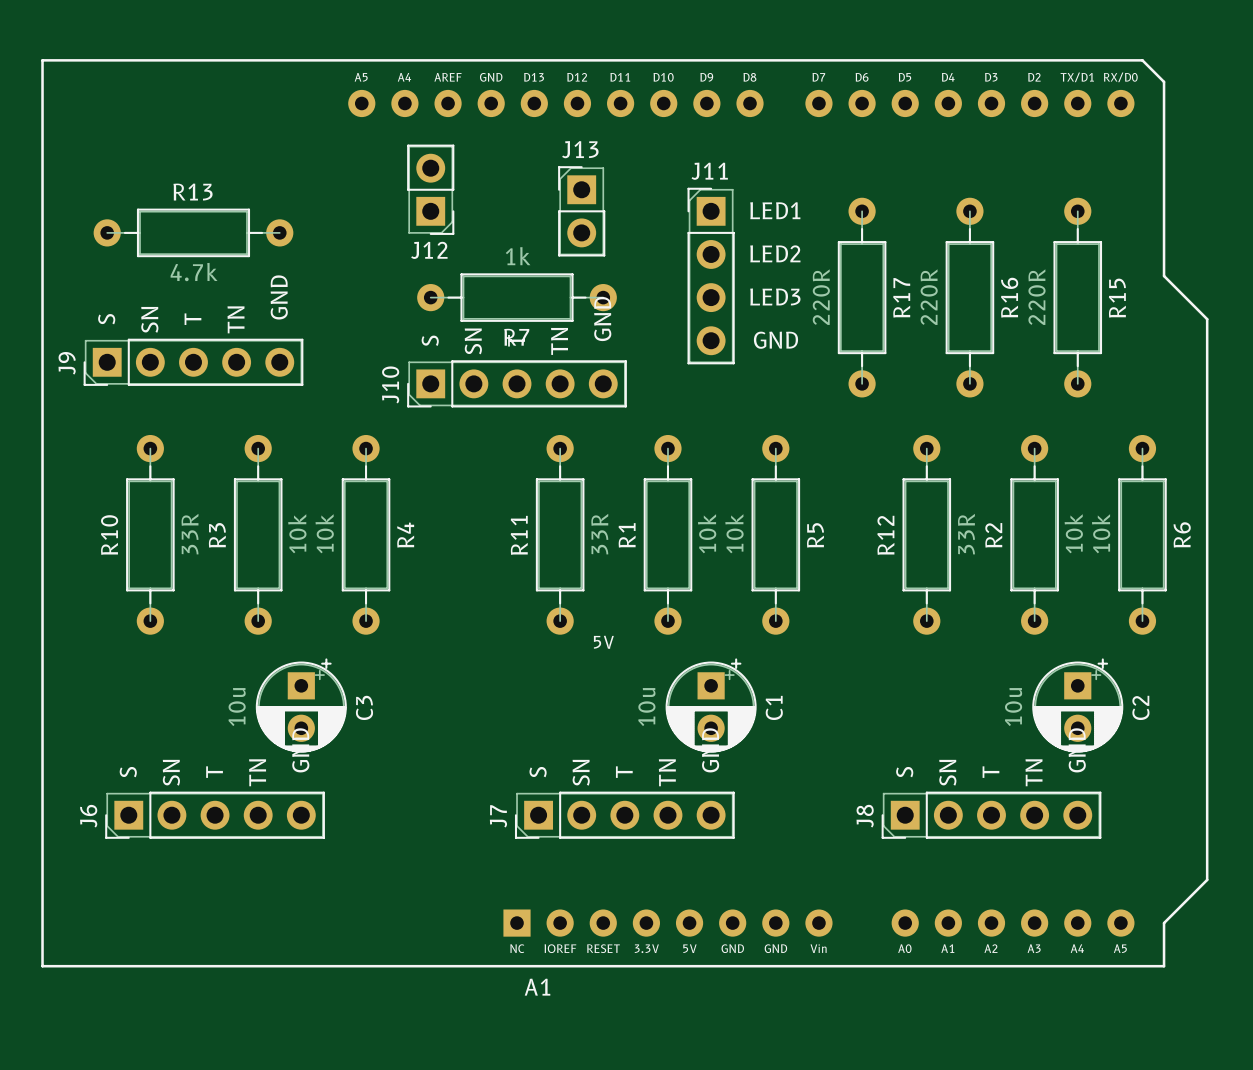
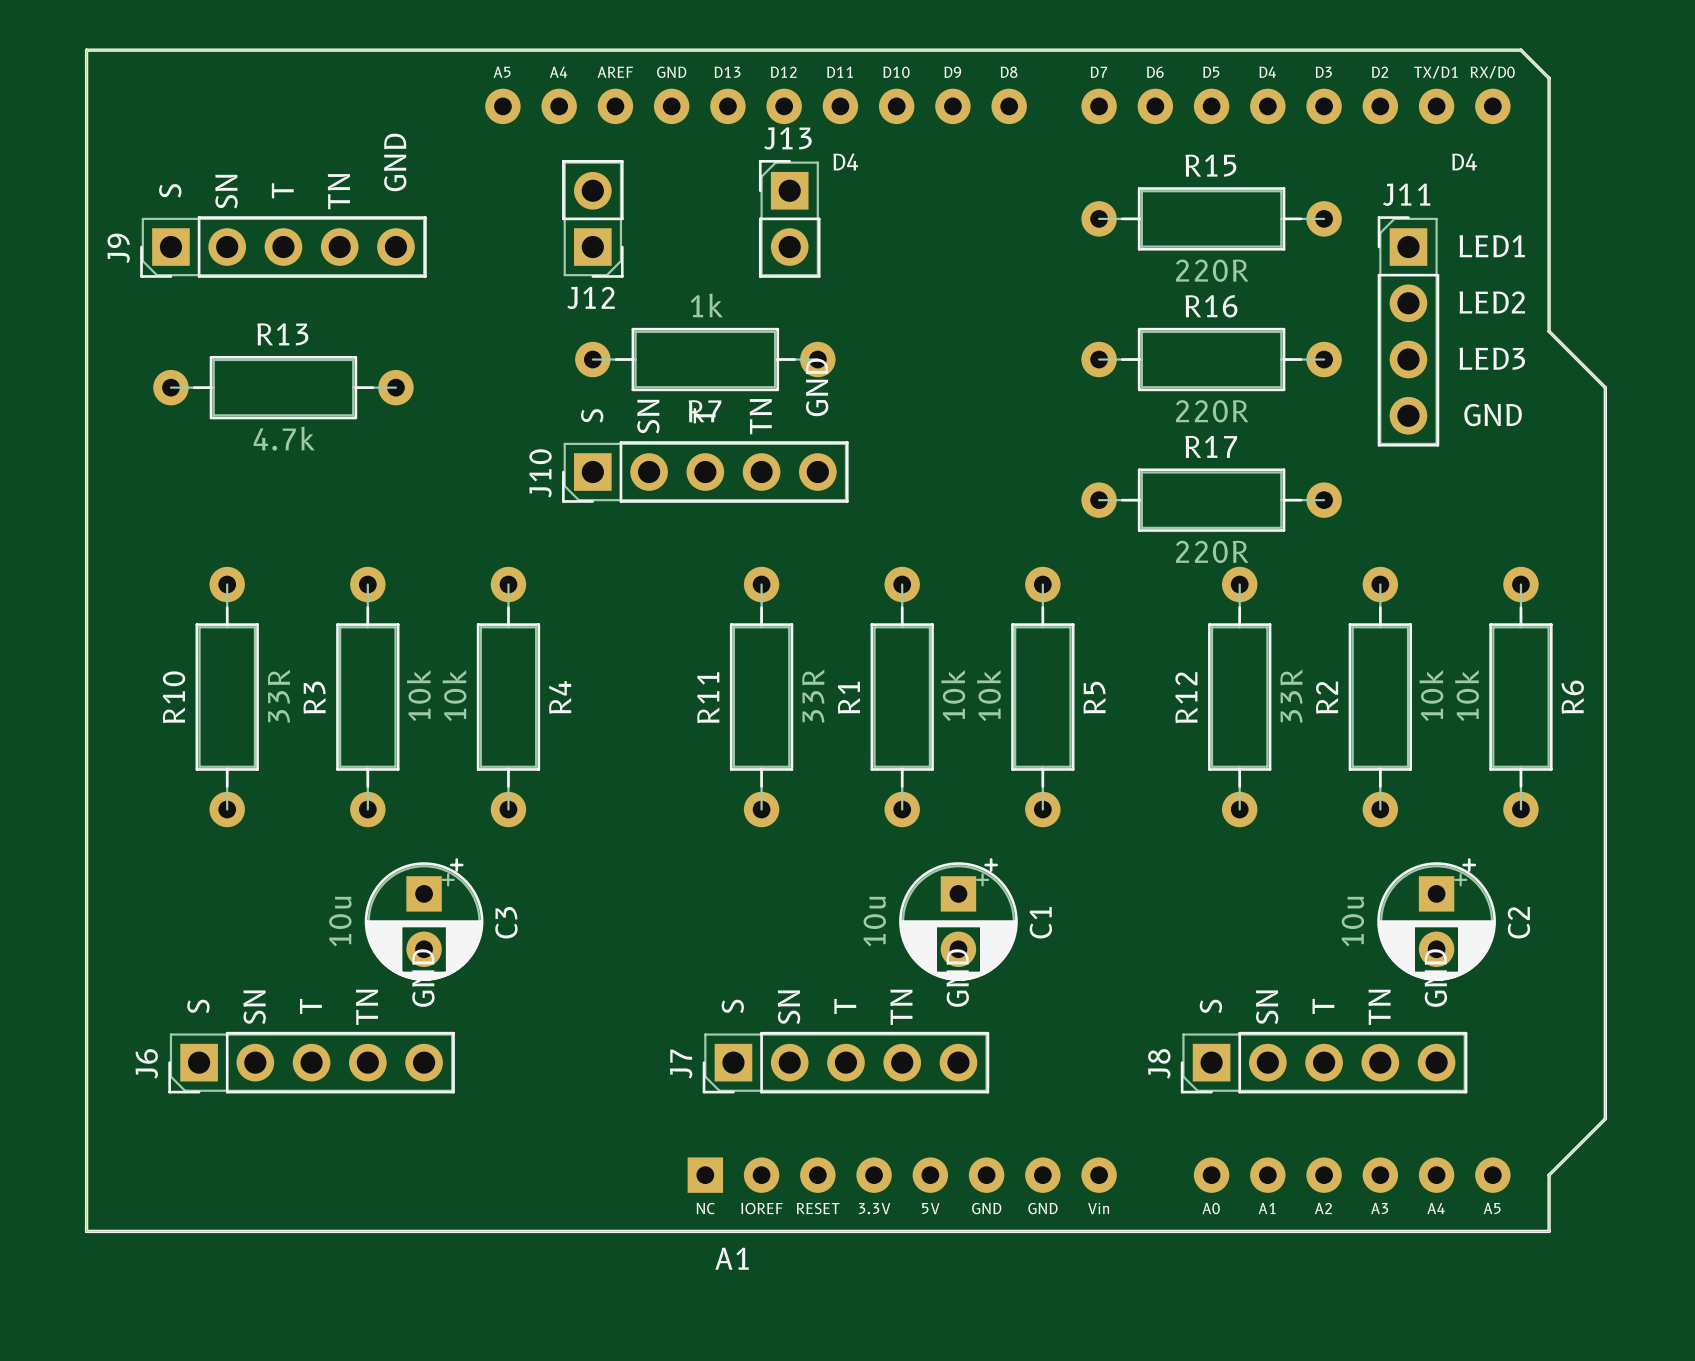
board edge: none -> (86, 50) (1520, 50) (1549, 78) (1549, 331) (1605, 387) (1605, 1118) (1549, 1175) (1549, 1231) (86, 1231) (86, 50)
text: none -> D4 (845, 162)
text: none -> D4 (1464, 162)
J13 position: (581, 211) -> (789, 218)
R13 position: (193, 232) -> (283, 387)
J11 position: (711, 276) -> (1408, 331)
R17 value position: 220R (821, 297) -> 220R (1212, 551)
R17 rotation: 0° (862, 297) -> 90° clockwise (1211, 500)
R17 name position: R17 (901, 297) -> R17 (1211, 446)
R16 value position: 220R (929, 297) -> 220R (1212, 411)
R16 rotation: 0° (969, 297) -> 90° clockwise (1211, 359)
R16 name position: R16 (1009, 297) -> R16 (1211, 306)
R15 value position: 220R (1036, 297) -> 220R (1212, 270)
R15 rotation: 0° (1077, 297) -> 90° clockwise (1211, 218)
R15 position: (1077, 297) -> (1211, 218)
R15 name position: R15 (1117, 298) -> R15 (1210, 165)
J9 position: (193, 362) -> (283, 247)
R10 position: (150, 534) -> (227, 697)
R3 position: (258, 534) -> (367, 697)
R4 position: (366, 534) -> (508, 697)
R11 position: (560, 534) -> (761, 697)
R1 position: (667, 534) -> (902, 697)
R5 position: (775, 534) -> (1042, 697)
R12 position: (926, 534) -> (1239, 697)
R2 position: (1034, 534) -> (1380, 697)
R6 position: (1142, 534) -> (1520, 697)
text: 5V (603, 642) -> none
C3 position: (301, 705) -> (424, 919)
C1 position: (711, 705) -> (958, 919)
C2 position: (1077, 705) -> (1436, 919)
J6 position: (215, 815) -> (311, 1062)
J7 position: (624, 815) -> (845, 1062)
J8 position: (991, 815) -> (1324, 1062)

